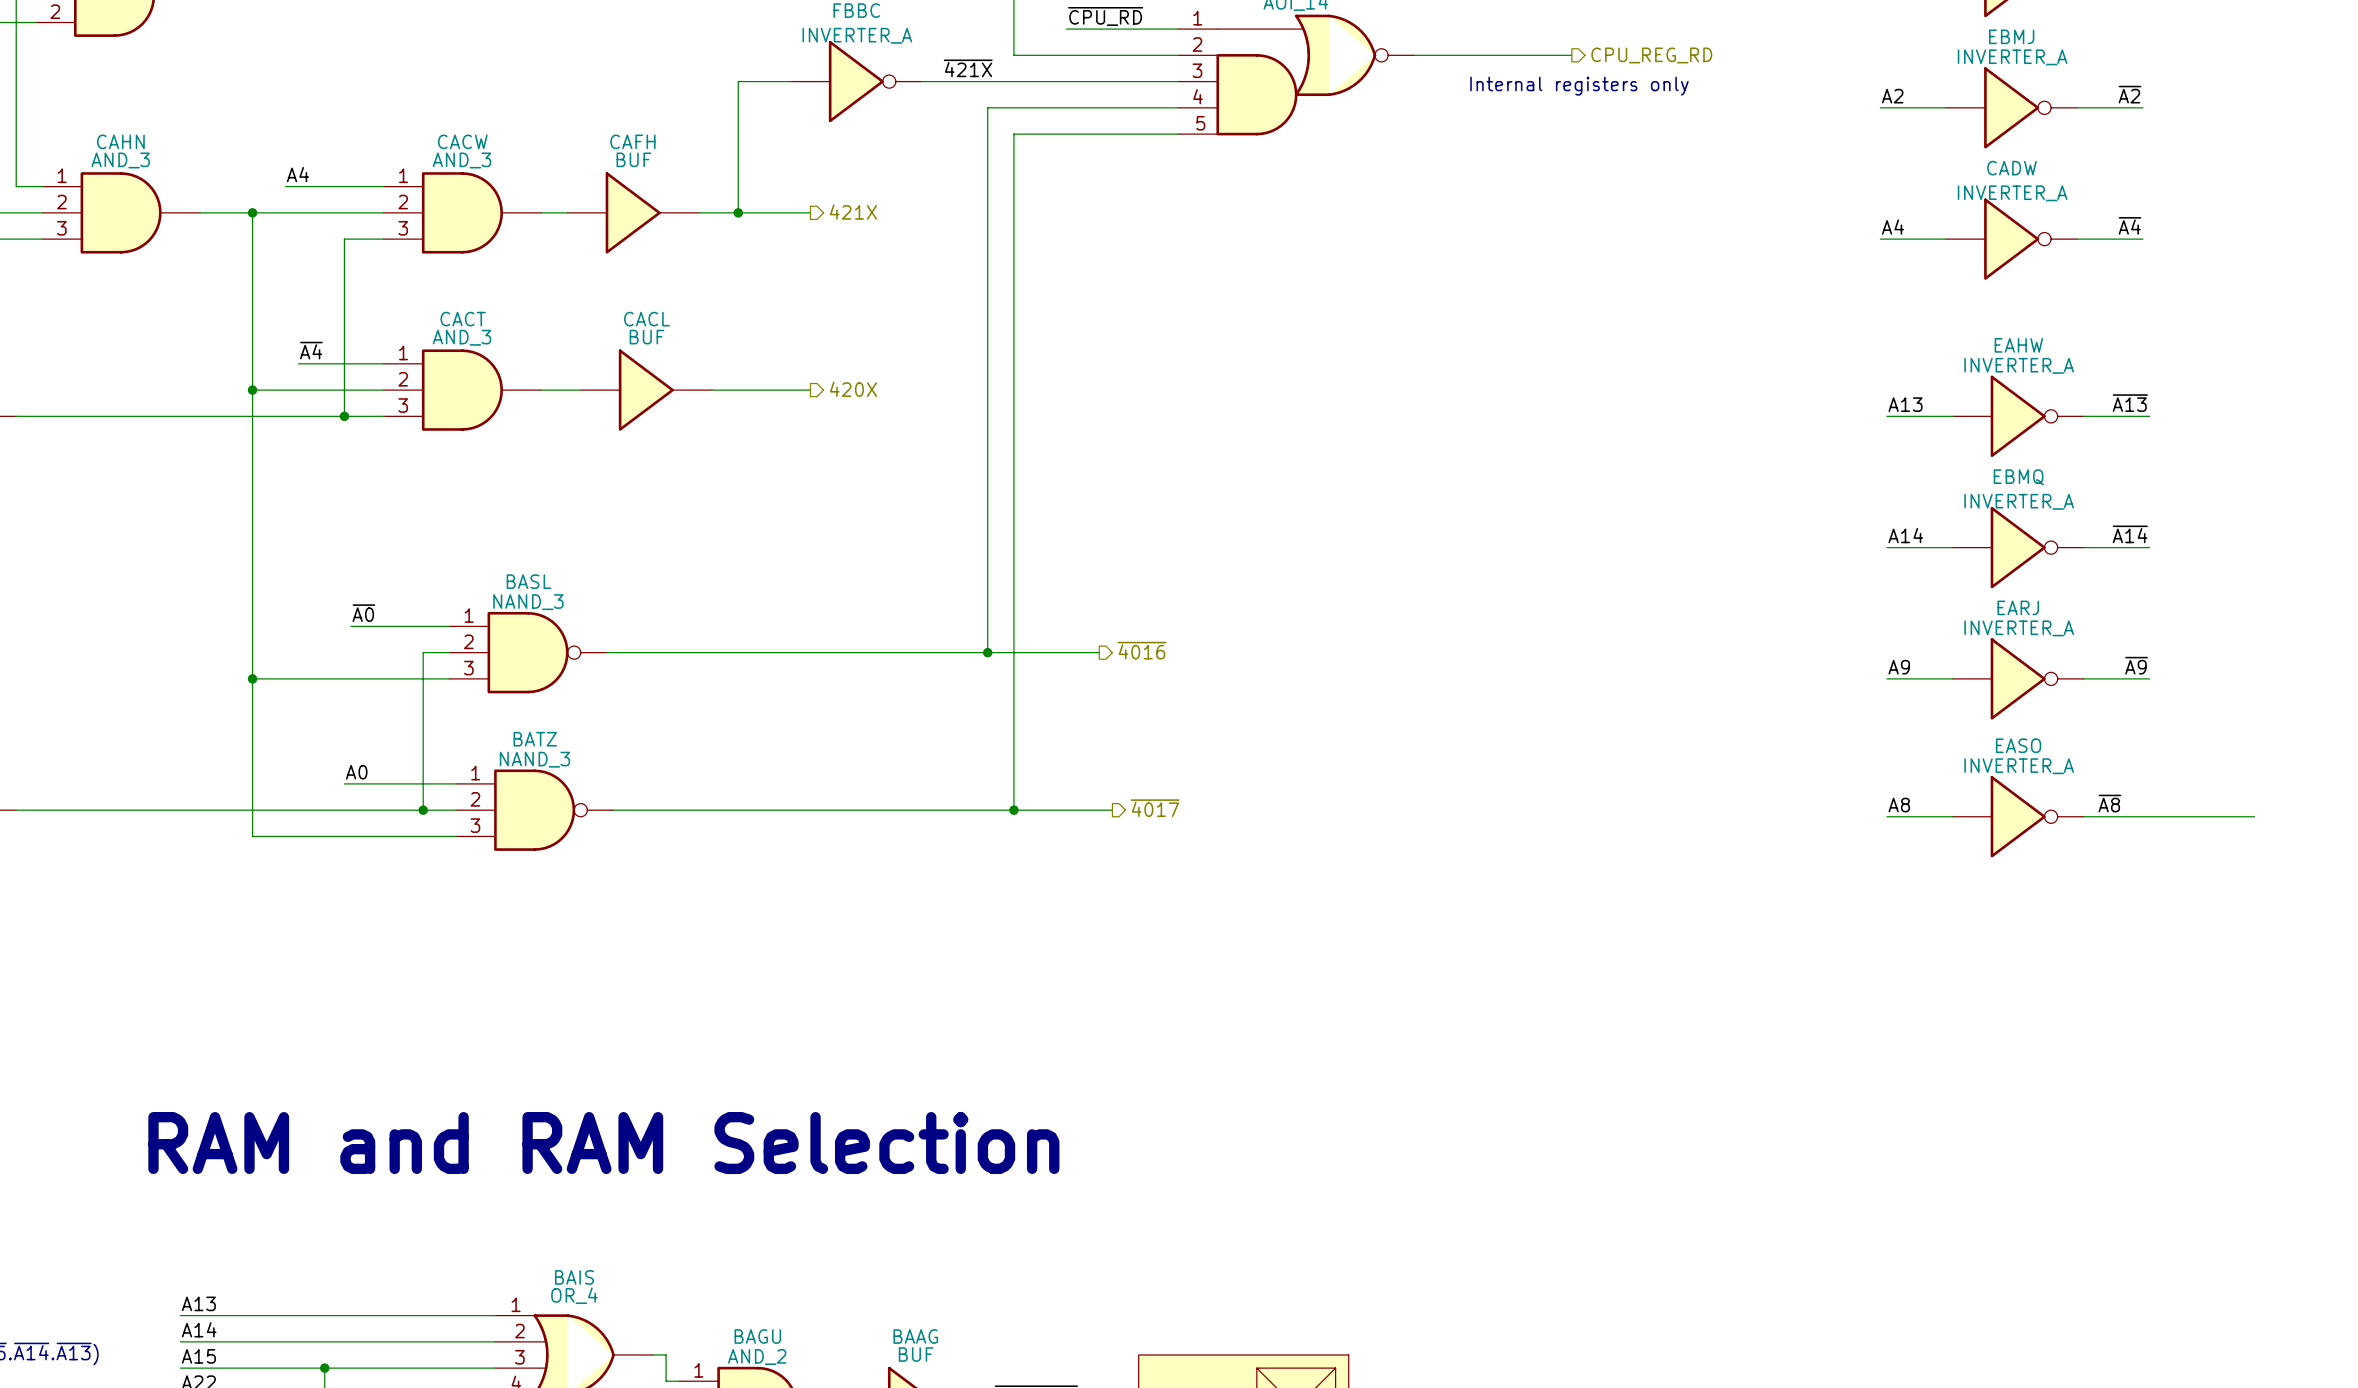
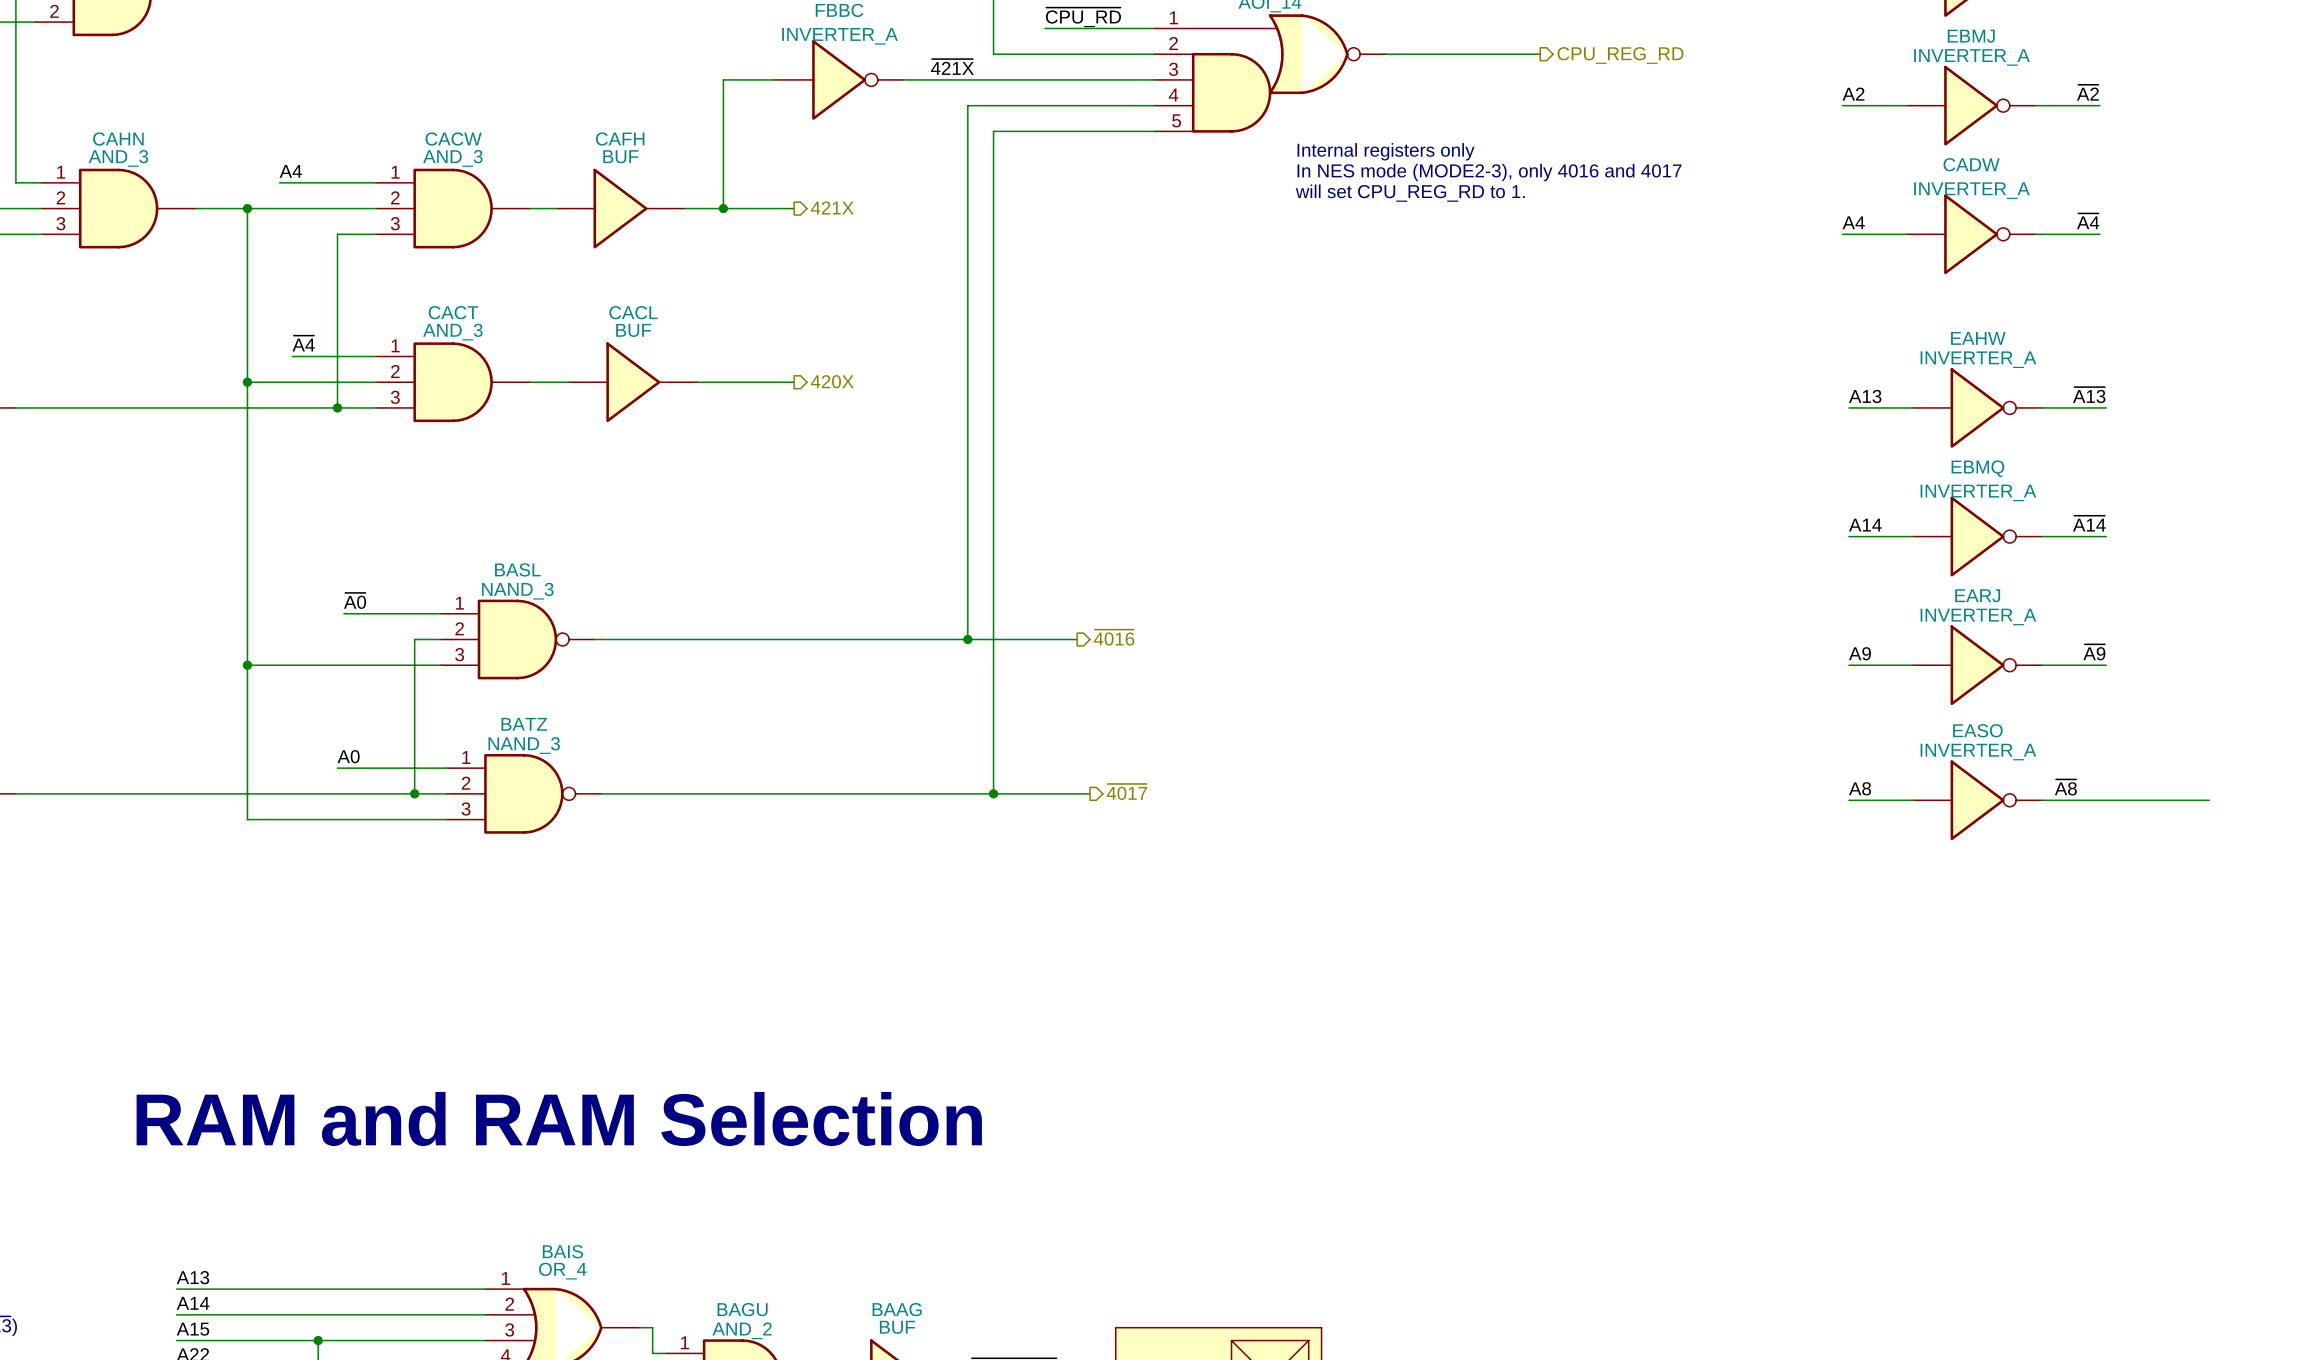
text position: Internal registers only (1579, 86) -> Internal registers only (1386, 151)
text: none -> In NES mode (MODE2-3), only 4016 and 4017 (1489, 172)
text: none -> will set CPU_REG_RD to 1. (1410, 193)

